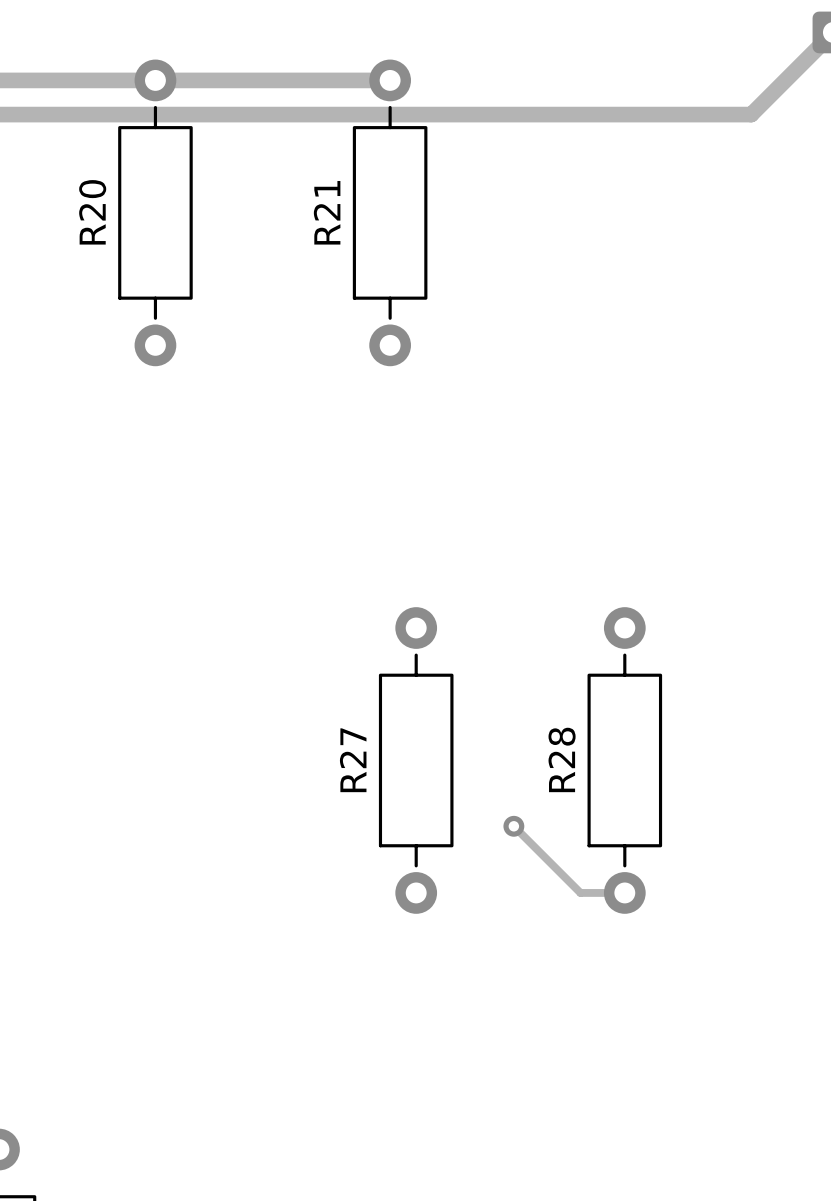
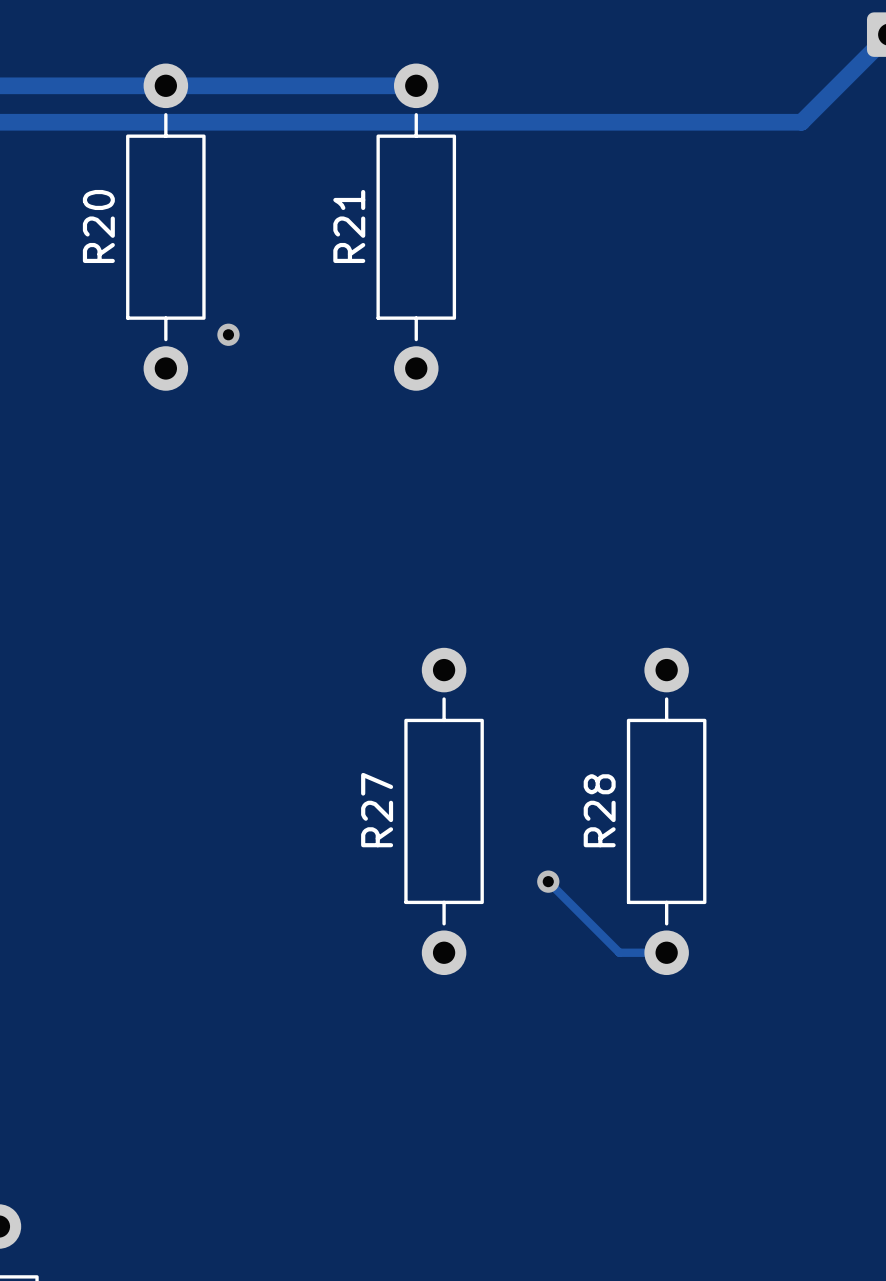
via: none -> (228, 334)

